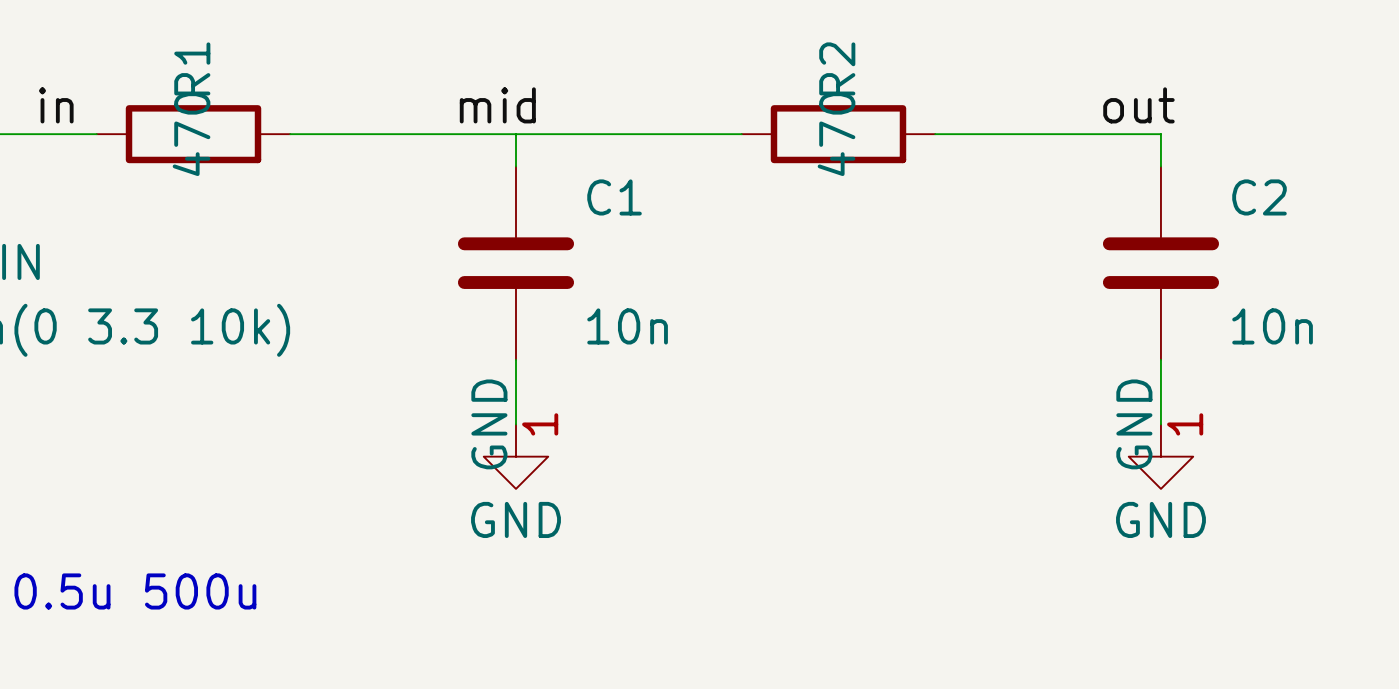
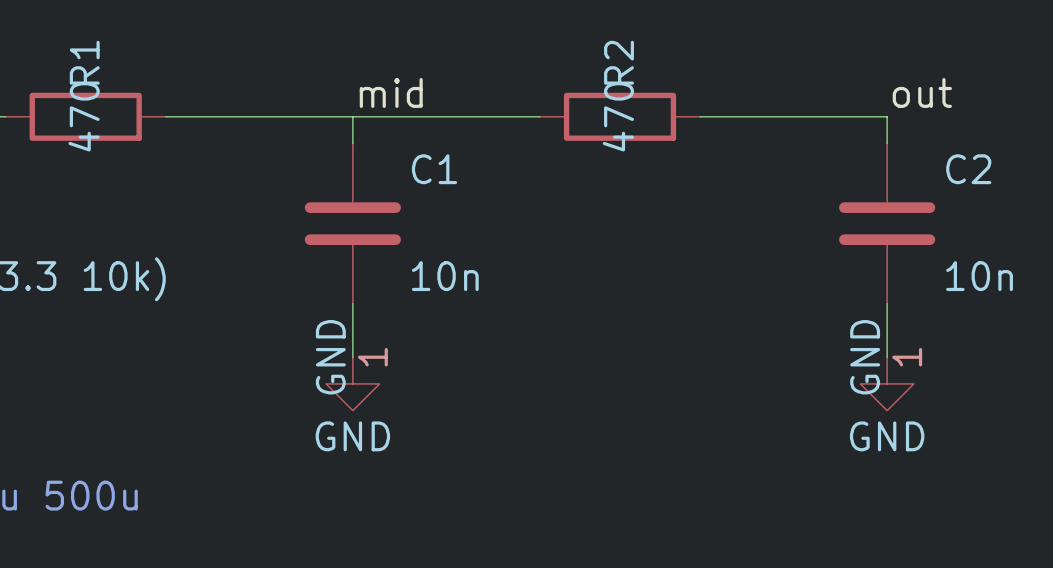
label position: mid (497, 105) -> mid (391, 92)
label position: out (1138, 105) -> out (922, 92)

